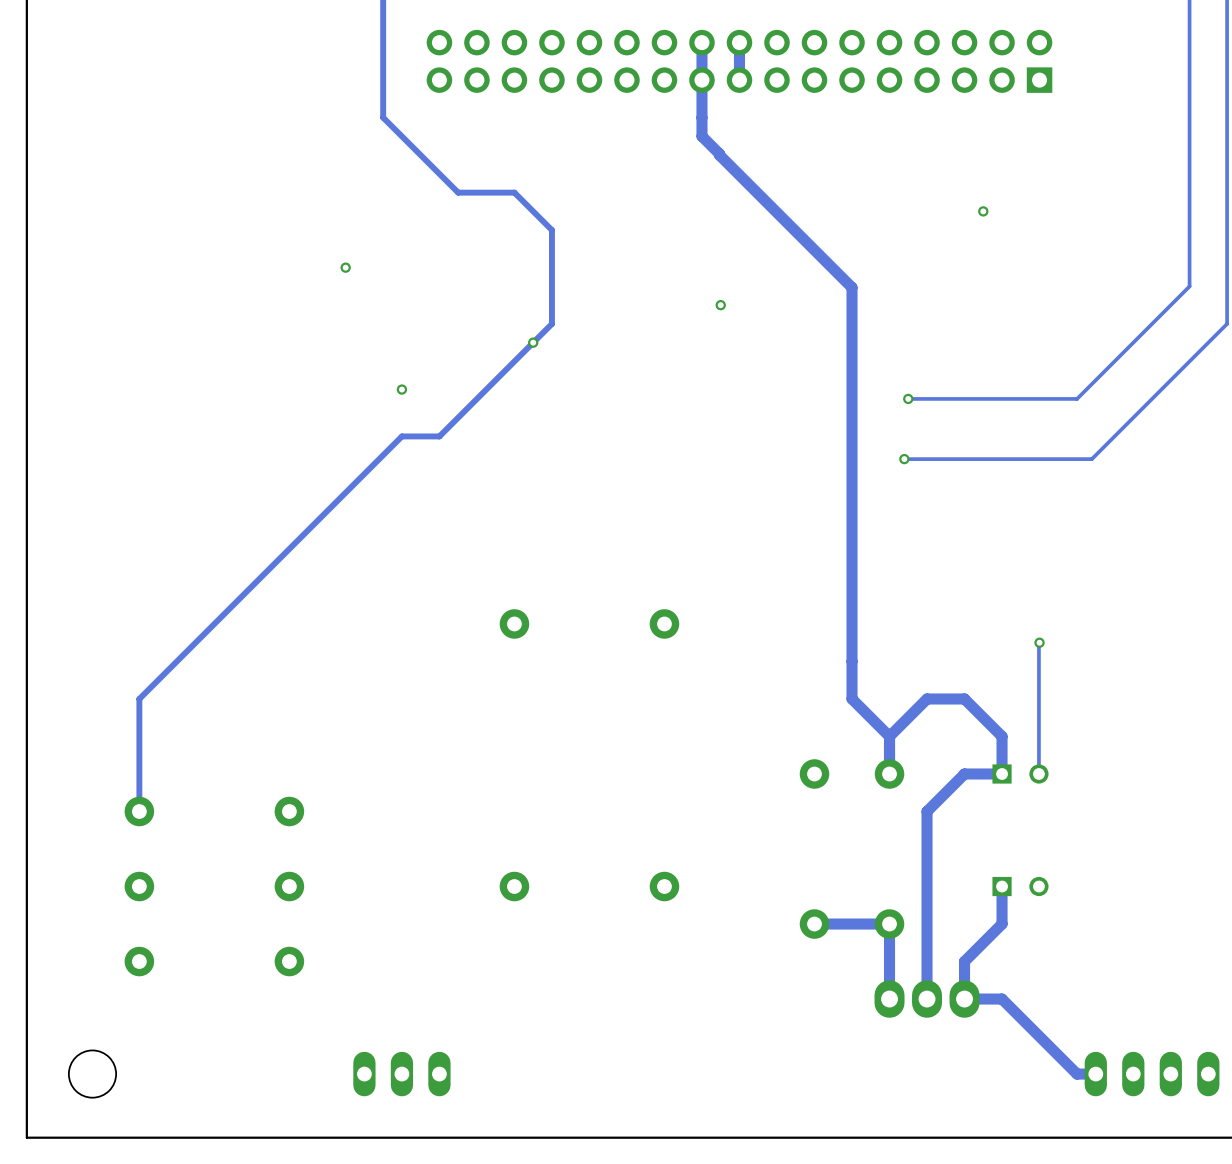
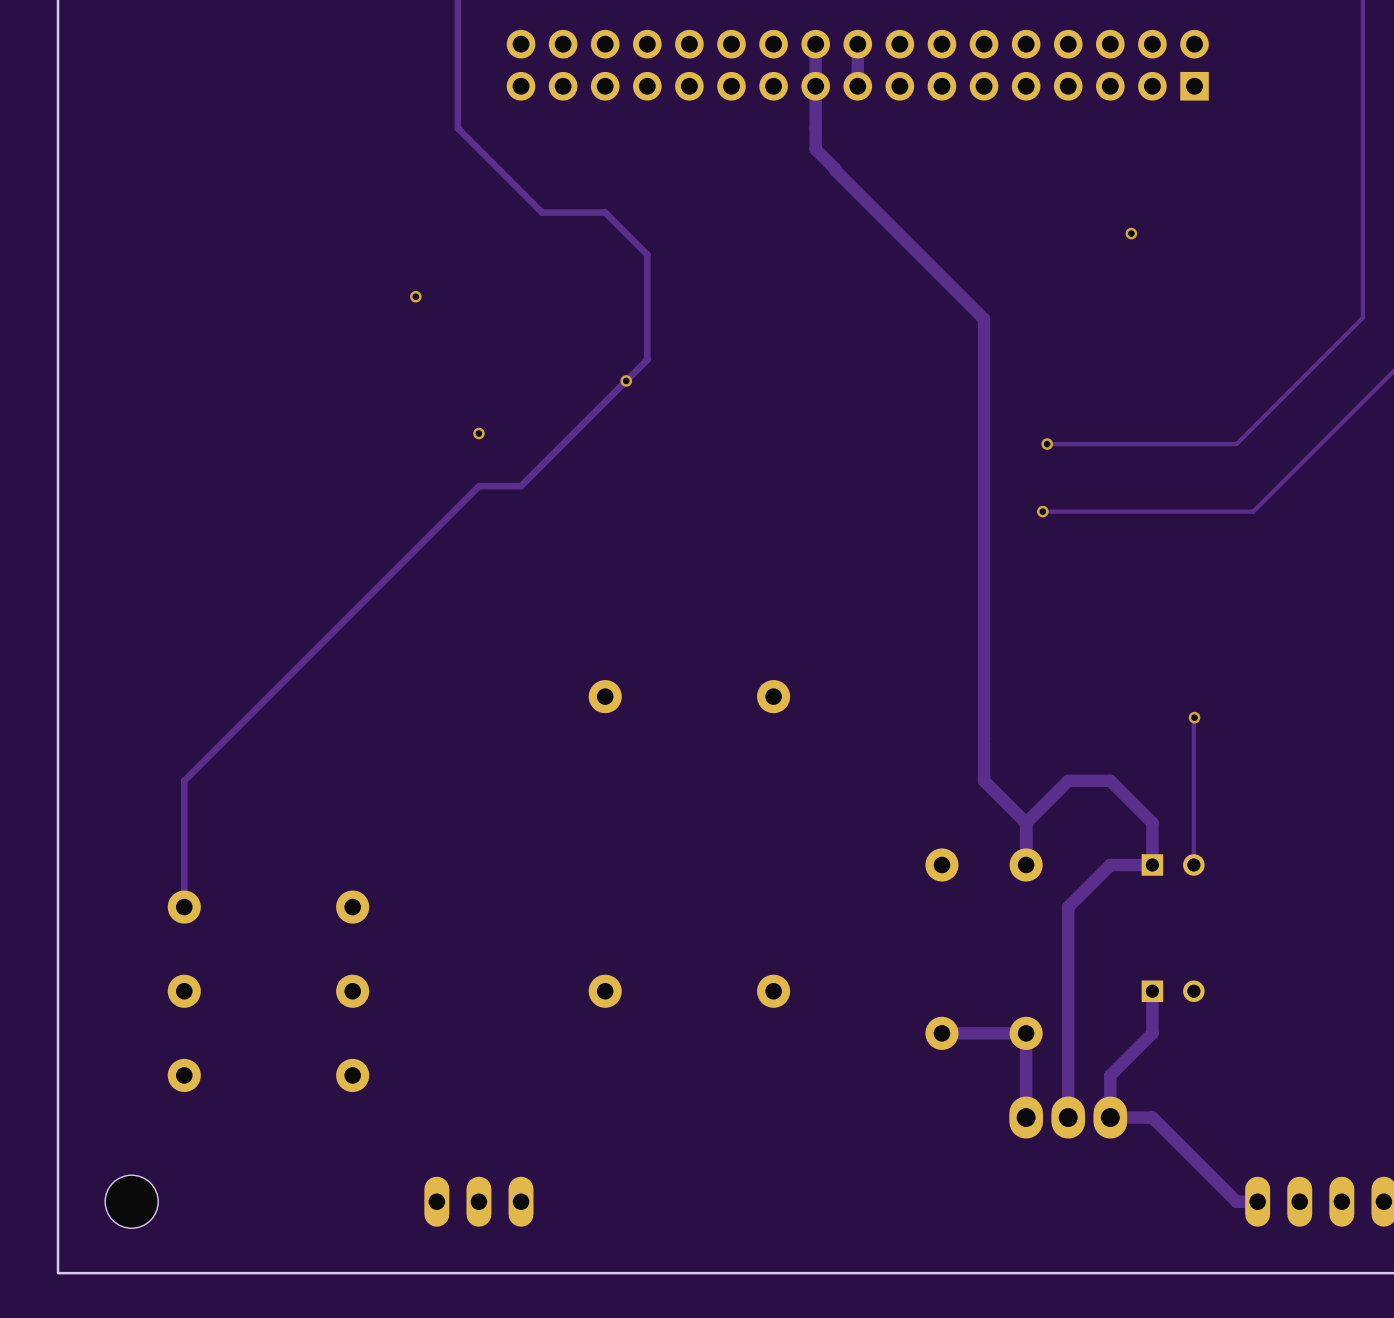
via: (720, 305) -> none

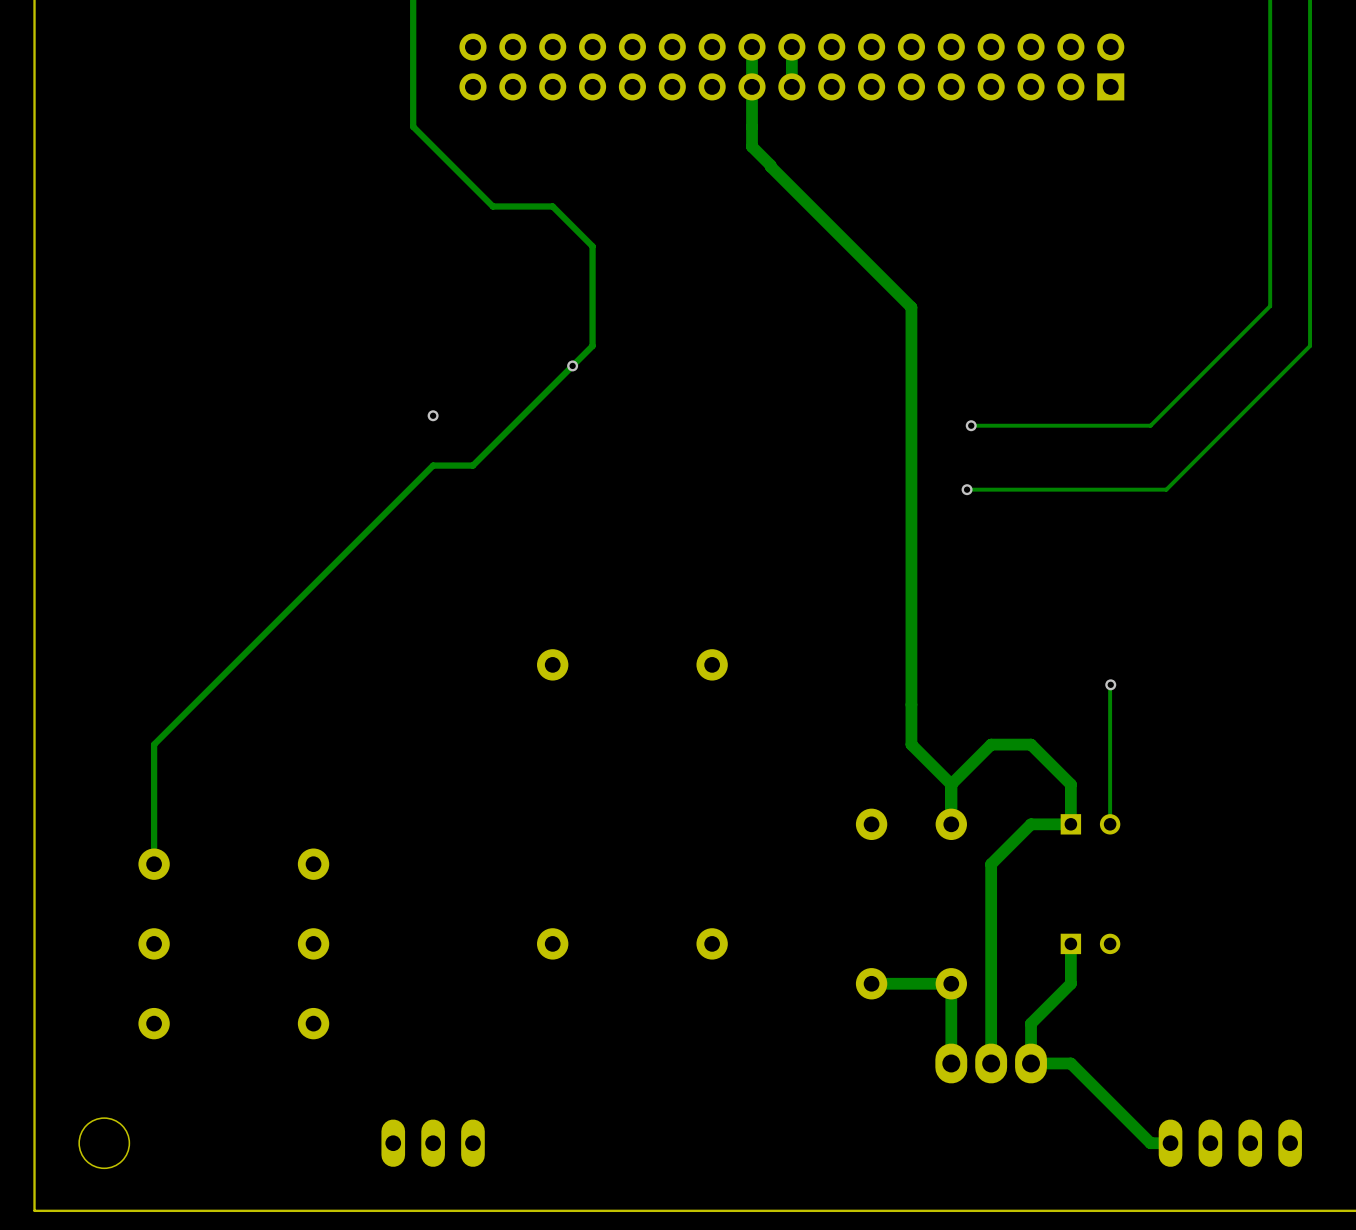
via: (1131, 233) -> none
via: (415, 296) -> none

